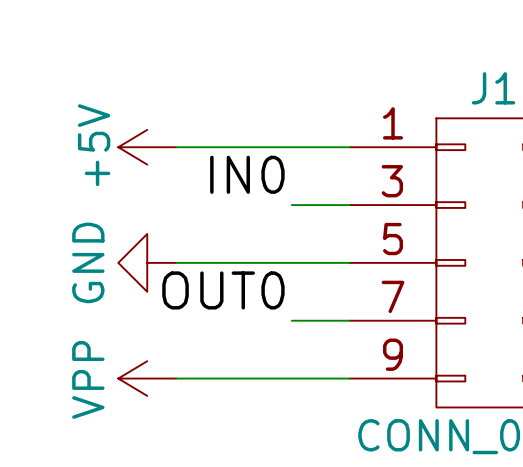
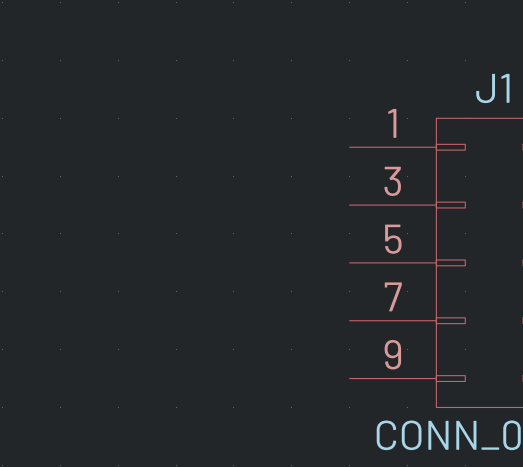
power symbol: +5V (147, 147) -> none
wire: (176, 147) (349, 147) -> none
label: IN0 (247, 174) -> none
wire: (291, 205) (349, 205) -> none
power symbol: GND (147, 262) -> none
wire: (176, 262) (349, 262) -> none
label: OUT0 (223, 290) -> none
wire: (291, 320) (349, 320) -> none
power symbol: VPP (147, 378) -> none
wire: (176, 378) (349, 378) -> none

